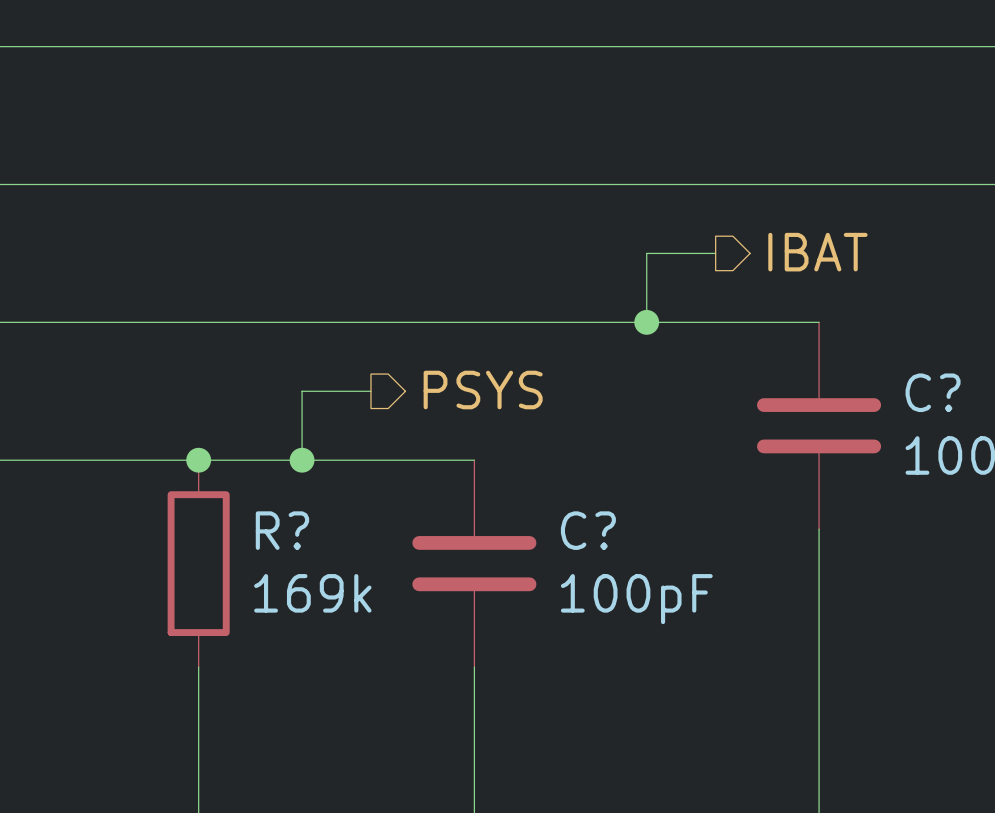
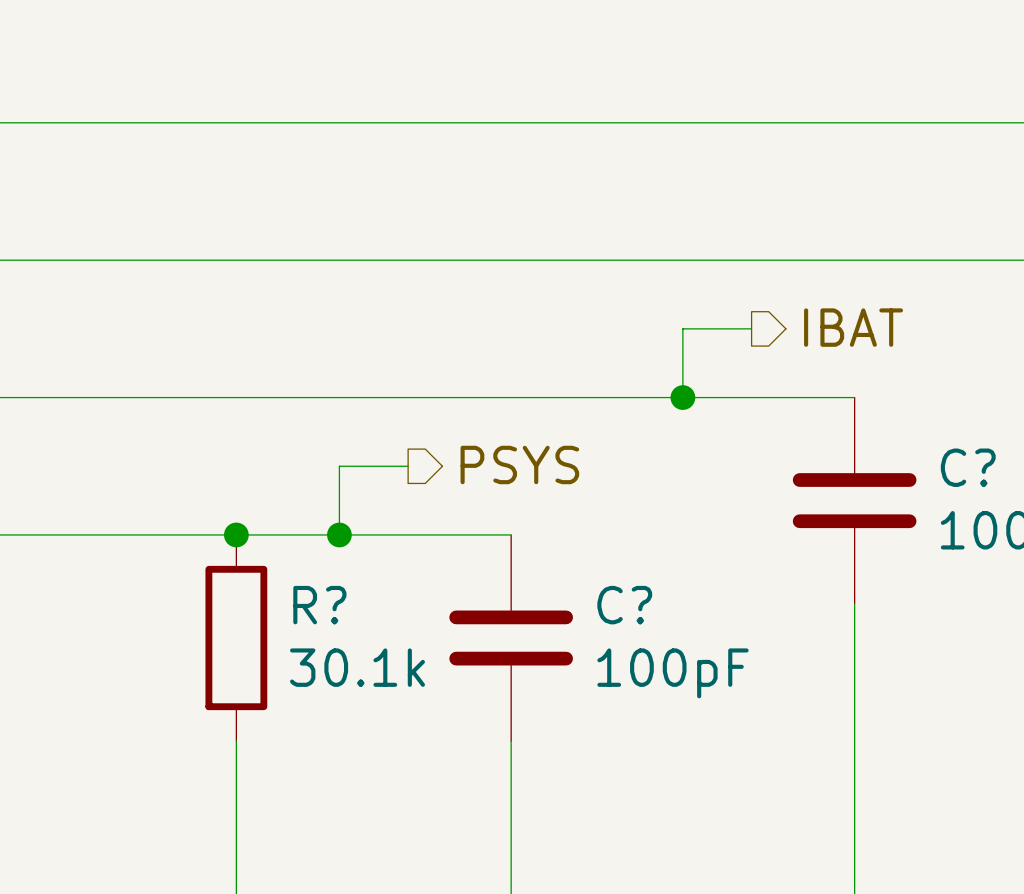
R? value: 169k (312, 593) -> 30.1k (357, 667)

